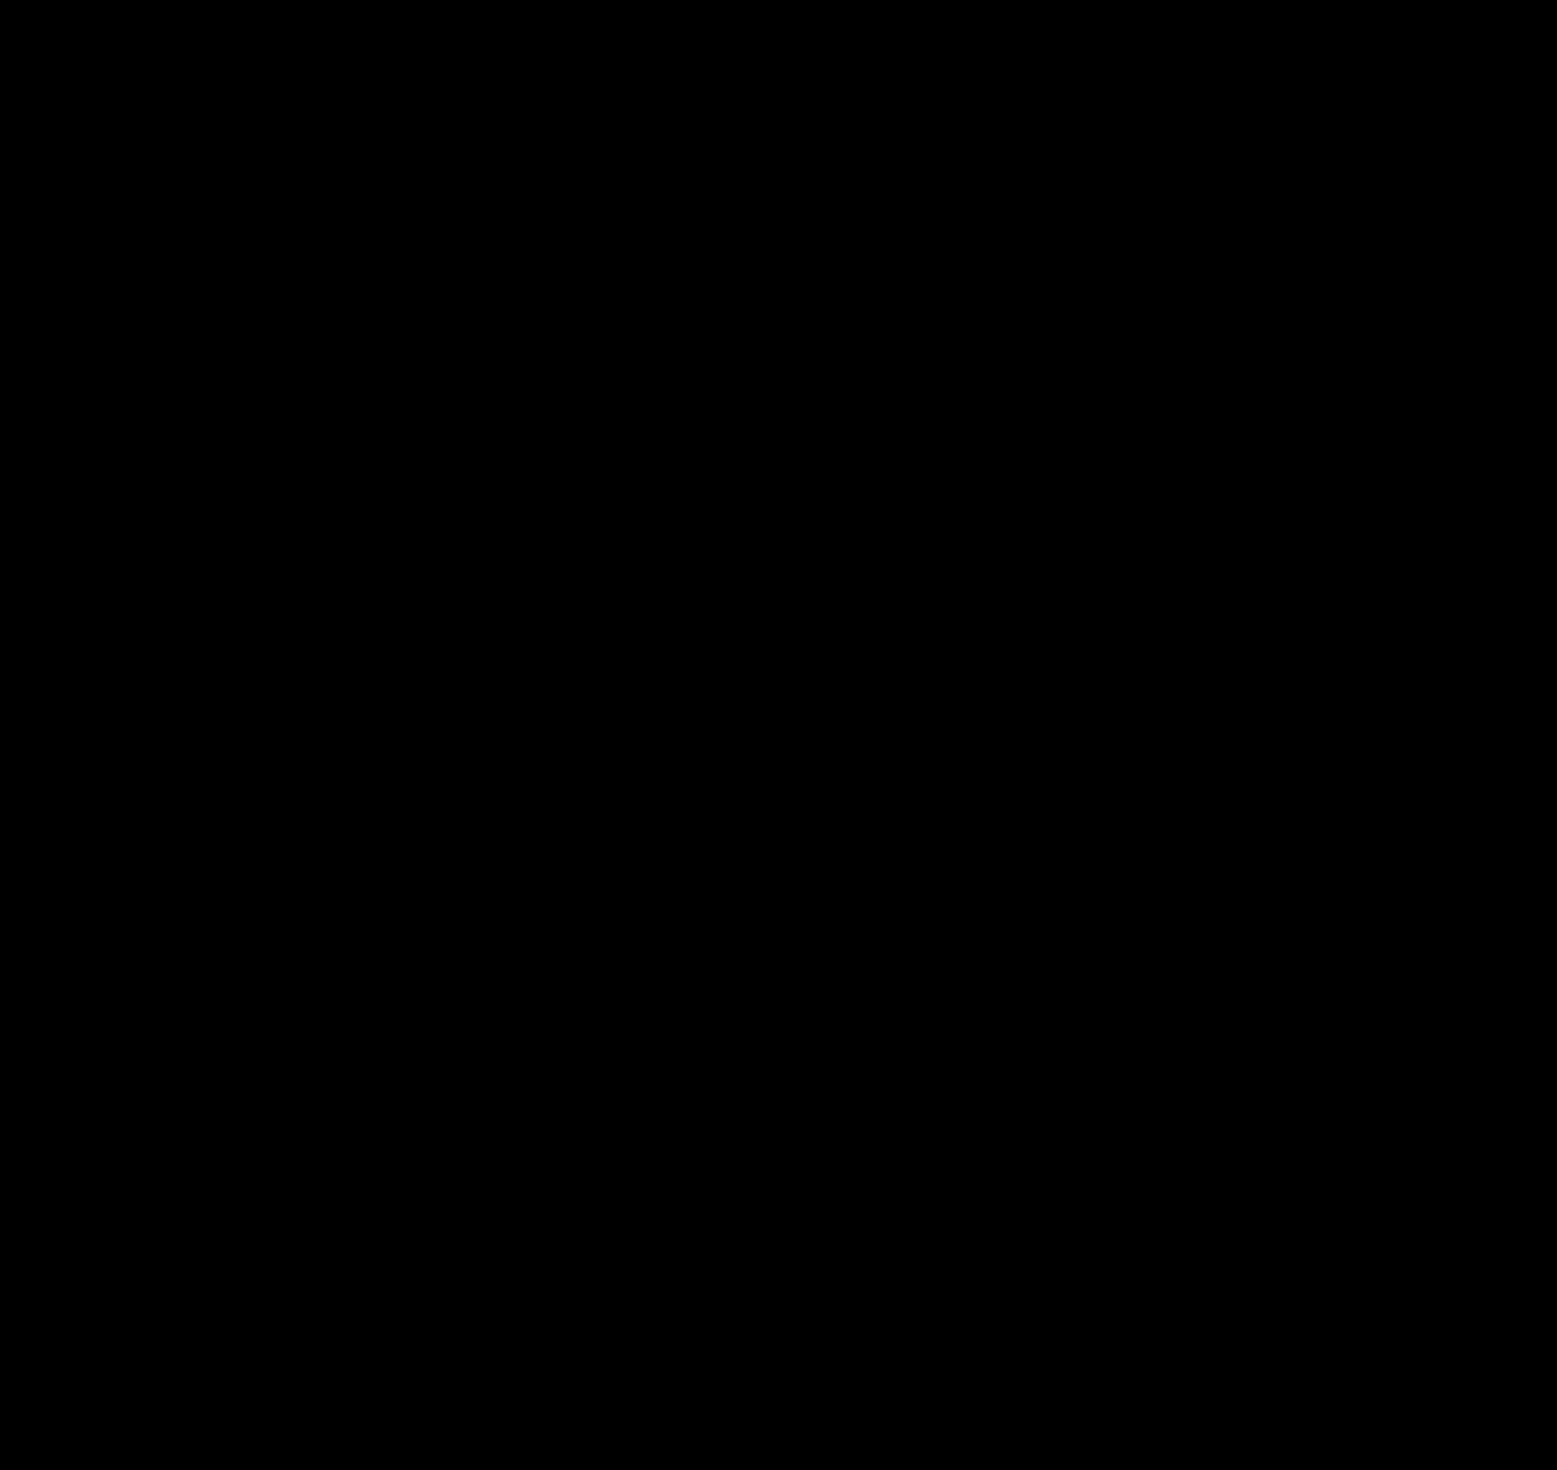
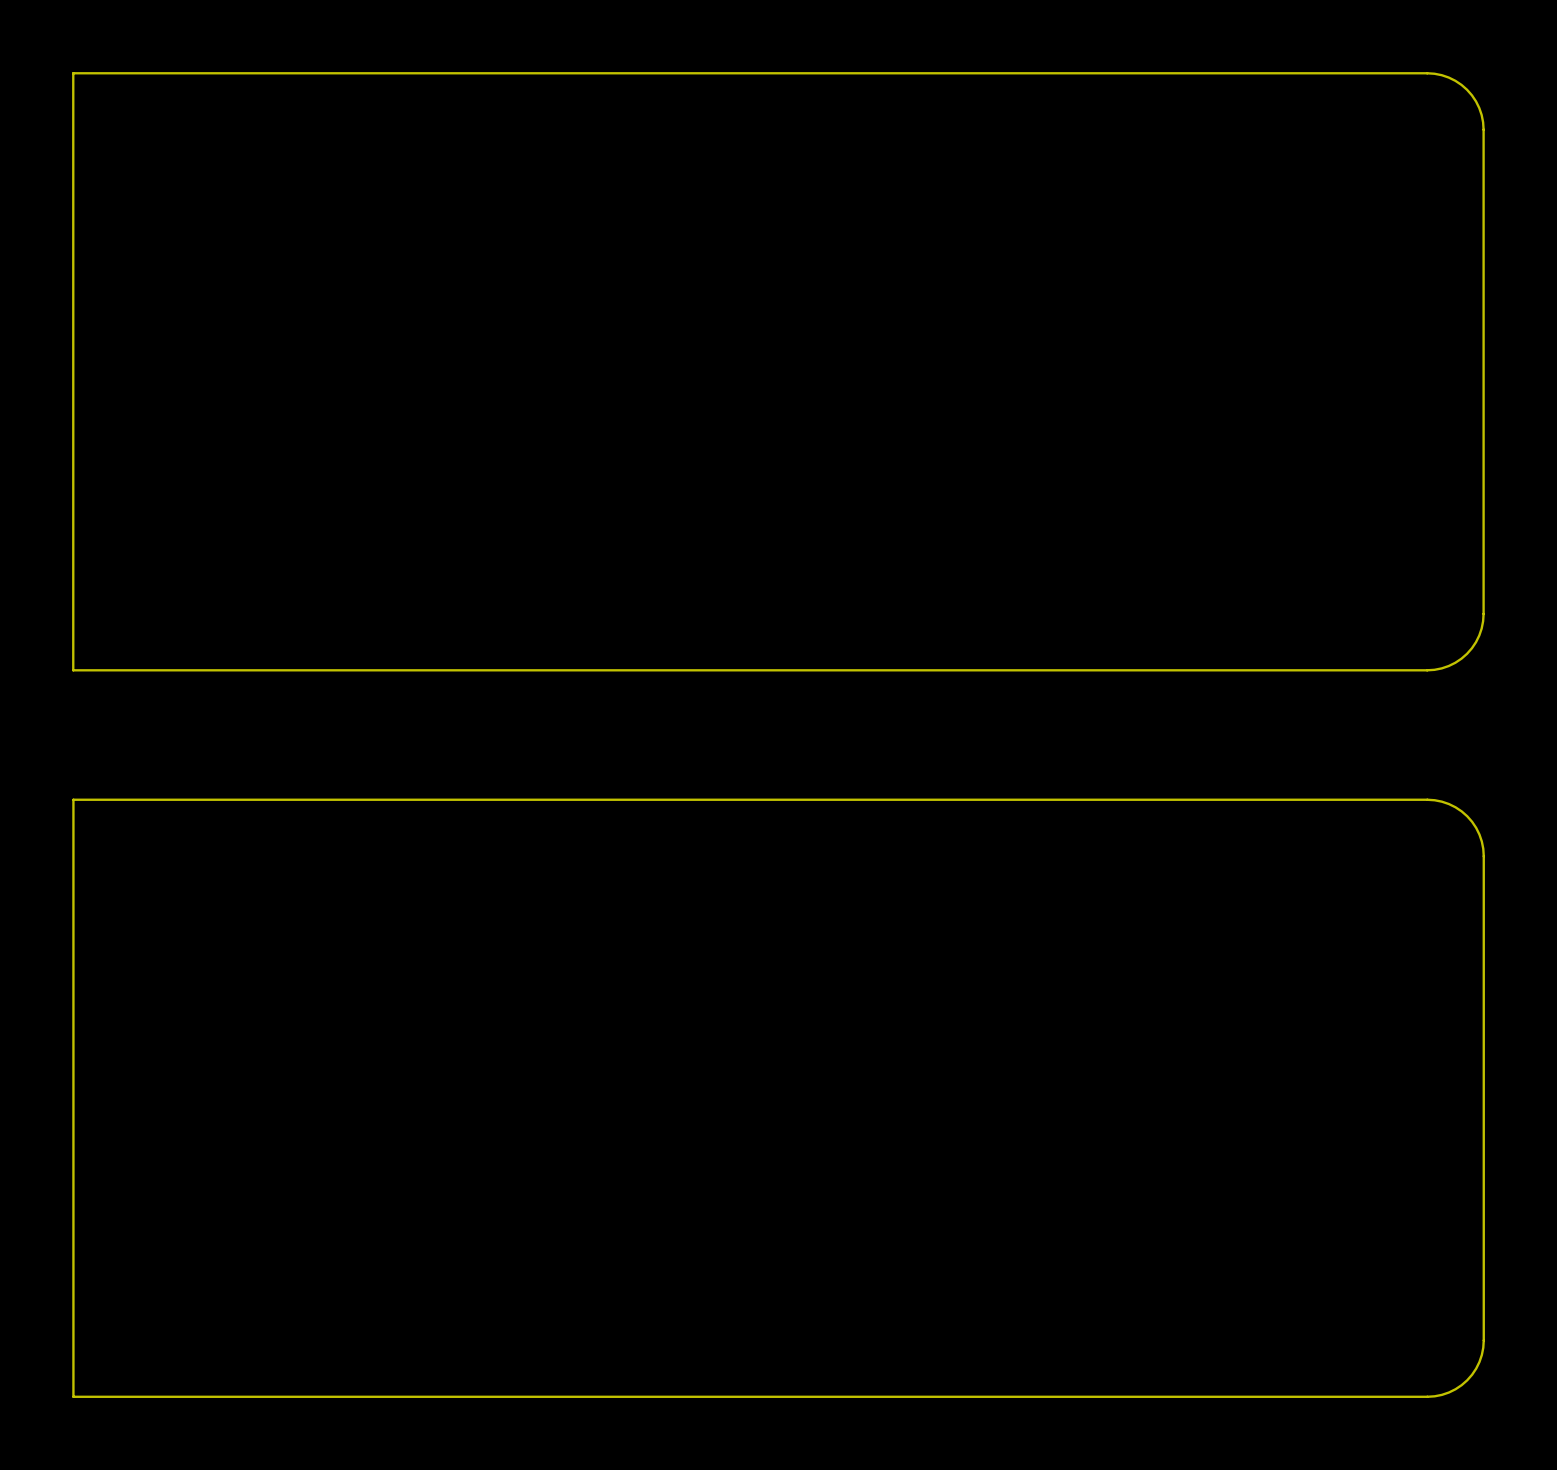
board edge: none -> (73, 73) (73, 670) (1427, 670) (1441, 668) (1455, 662) (1471, 648) (1479, 635) (1483, 613) (1483, 129) (1479, 108) (1471, 95) (1461, 84) (1448, 77) (1427, 73) (73, 73)
board edge: none -> (73, 799) (1427, 799) (1448, 804) (1467, 816) (1476, 827) (1481, 841) (1483, 856) (1483, 1340) (1479, 1361) (1472, 1374) (1455, 1389) (1441, 1394) (1427, 1396) (73, 1396) (73, 799)

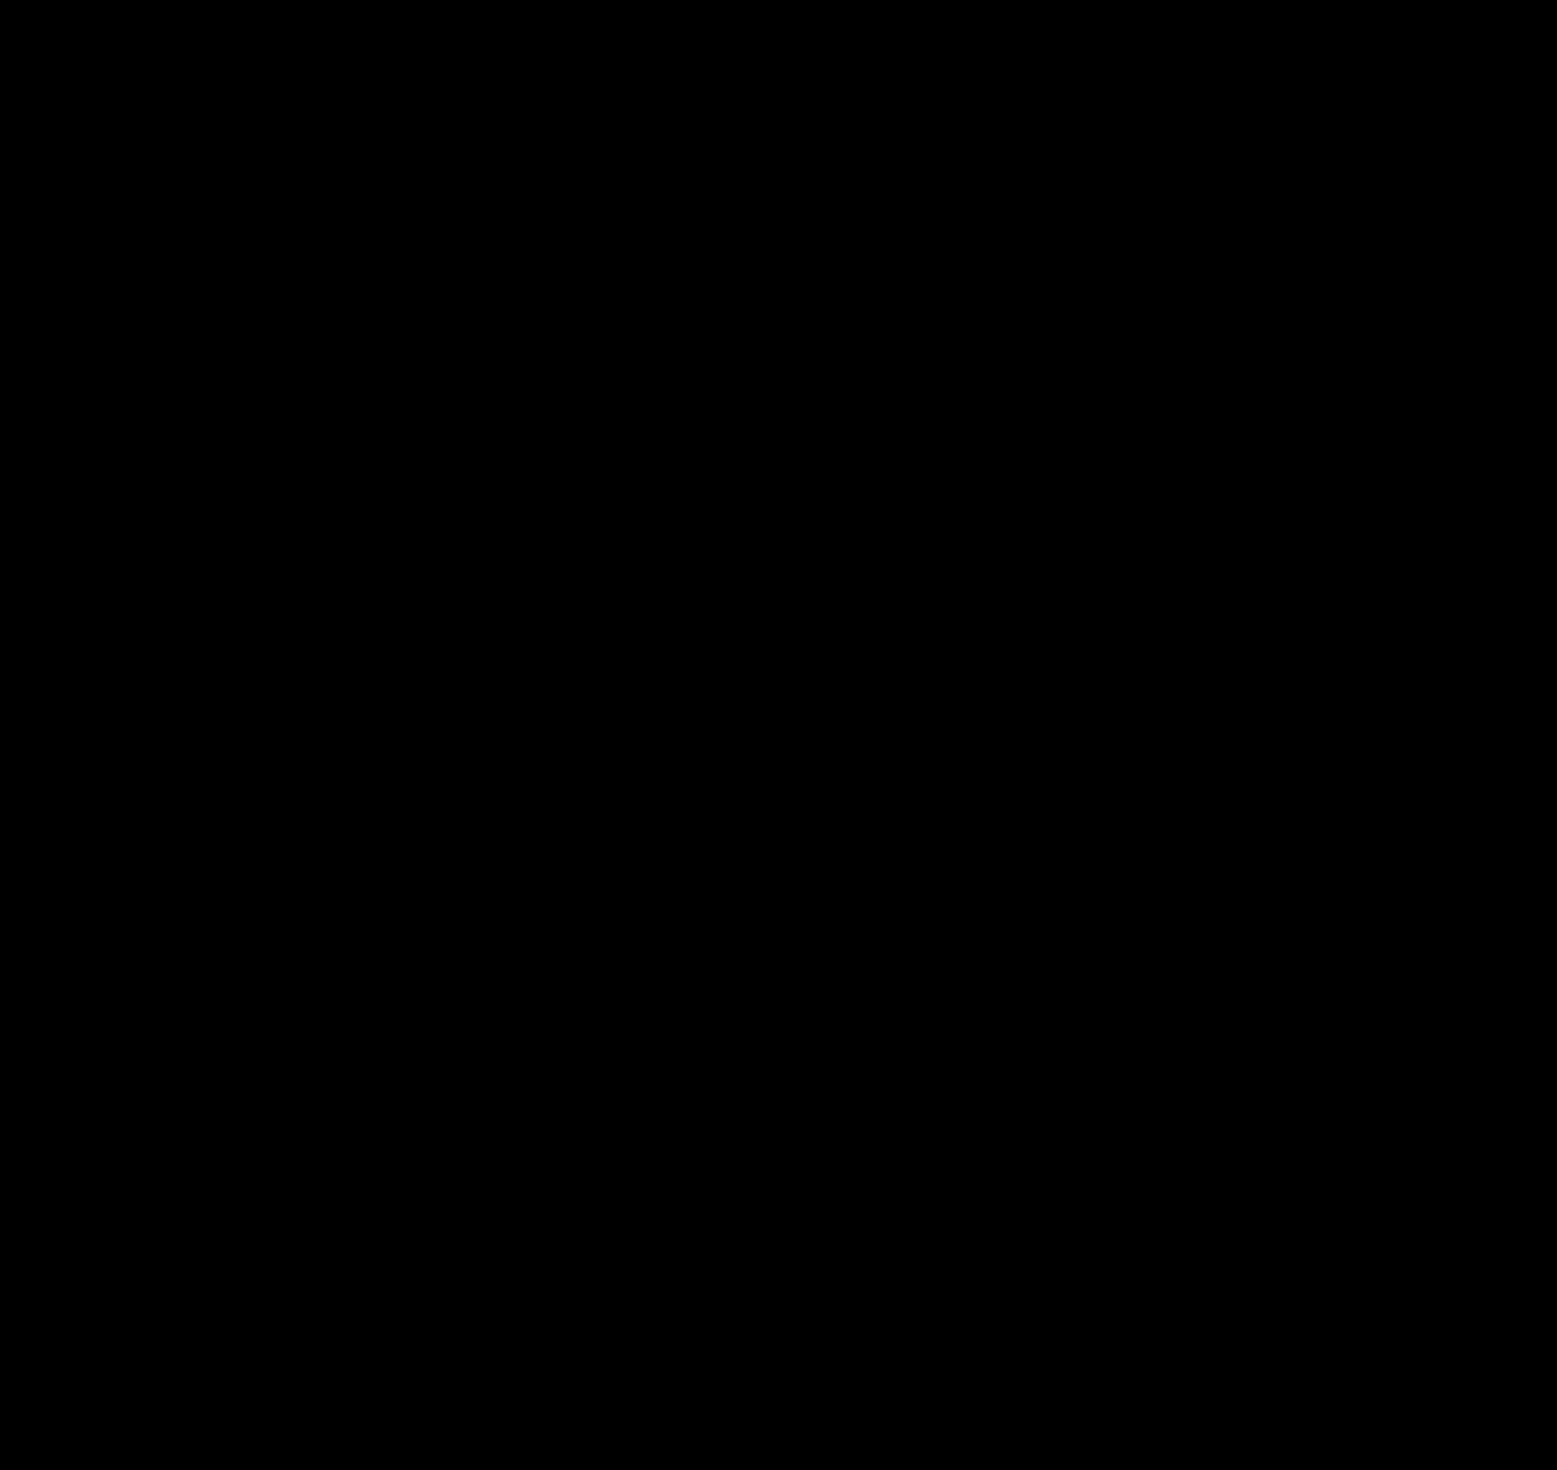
board edge: (73, 73) (73, 670) (1427, 670) (1441, 668) (1455, 662) (1471, 648) (1479, 635) (1483, 613) (1483, 129) (1479, 108) (1471, 95) (1461, 84) (1448, 77) (1427, 73) (73, 73) -> none
board edge: (73, 799) (1427, 799) (1448, 804) (1467, 816) (1476, 827) (1481, 841) (1483, 856) (1483, 1340) (1479, 1361) (1472, 1374) (1455, 1389) (1441, 1394) (1427, 1396) (73, 1396) (73, 799) -> none

